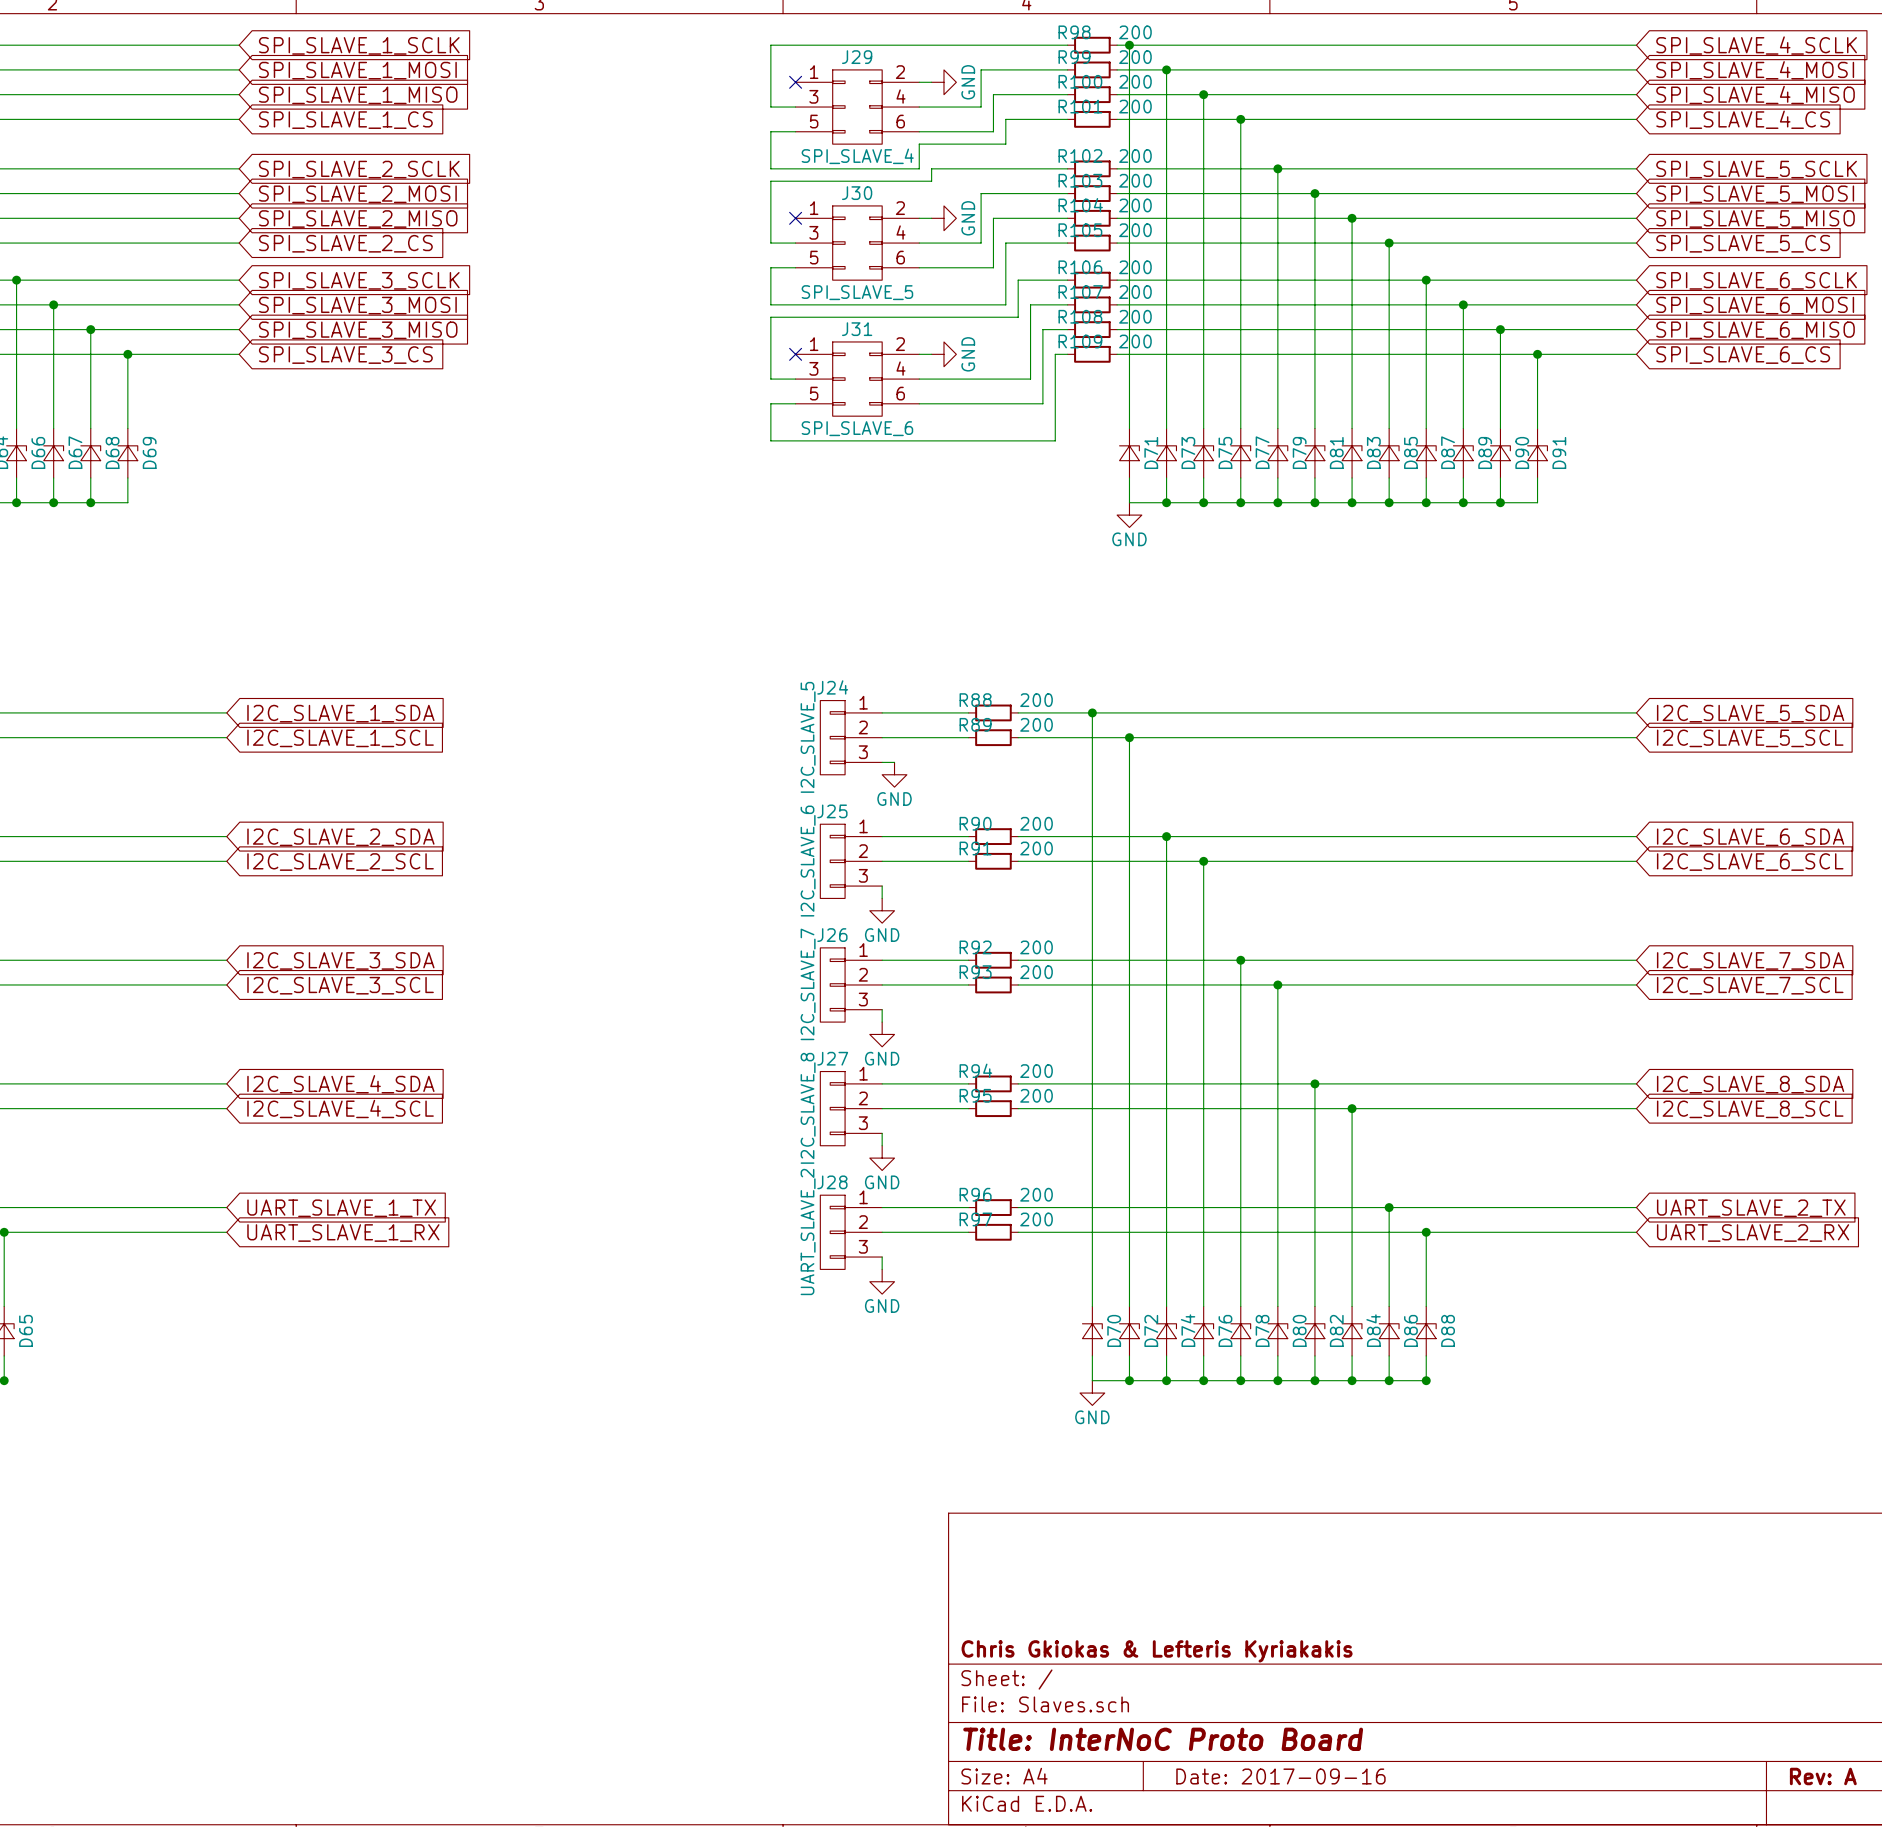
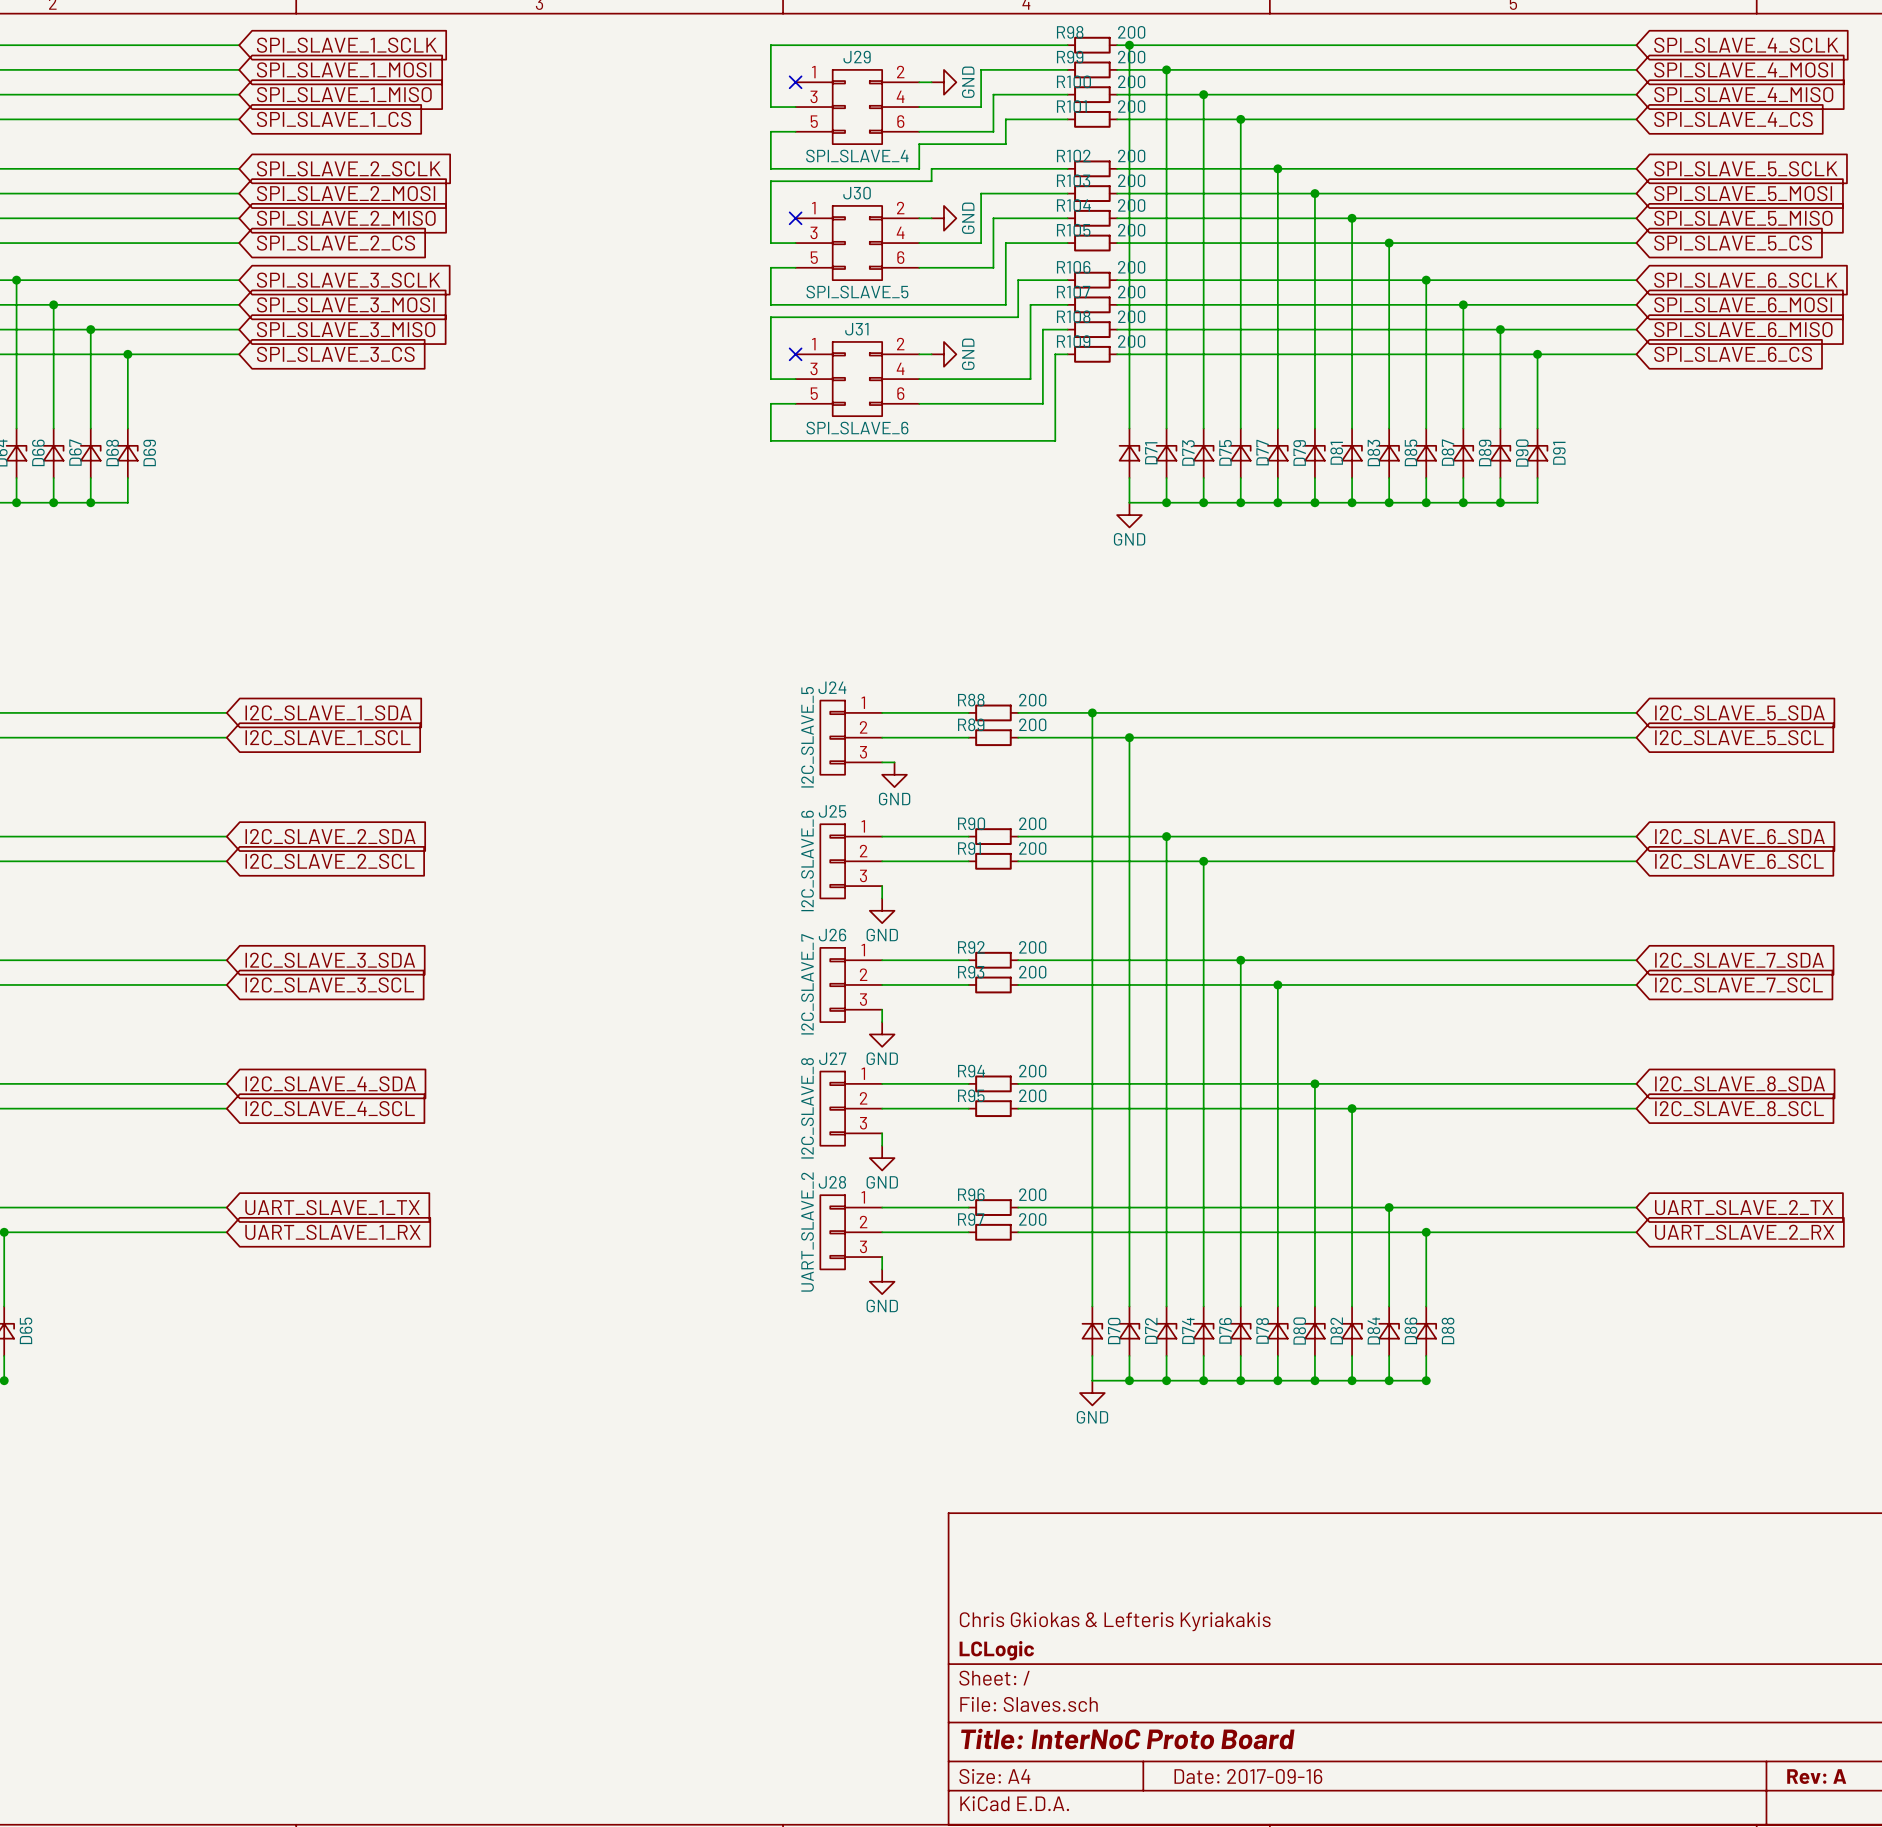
title block: none -> Chris Gkiokas & Lefteris Kyriakakis (1115, 1621)
title block: Chris Gkiokas & Lefteris Kyriakakis (1157, 1651) -> LCLogic (996, 1650)

